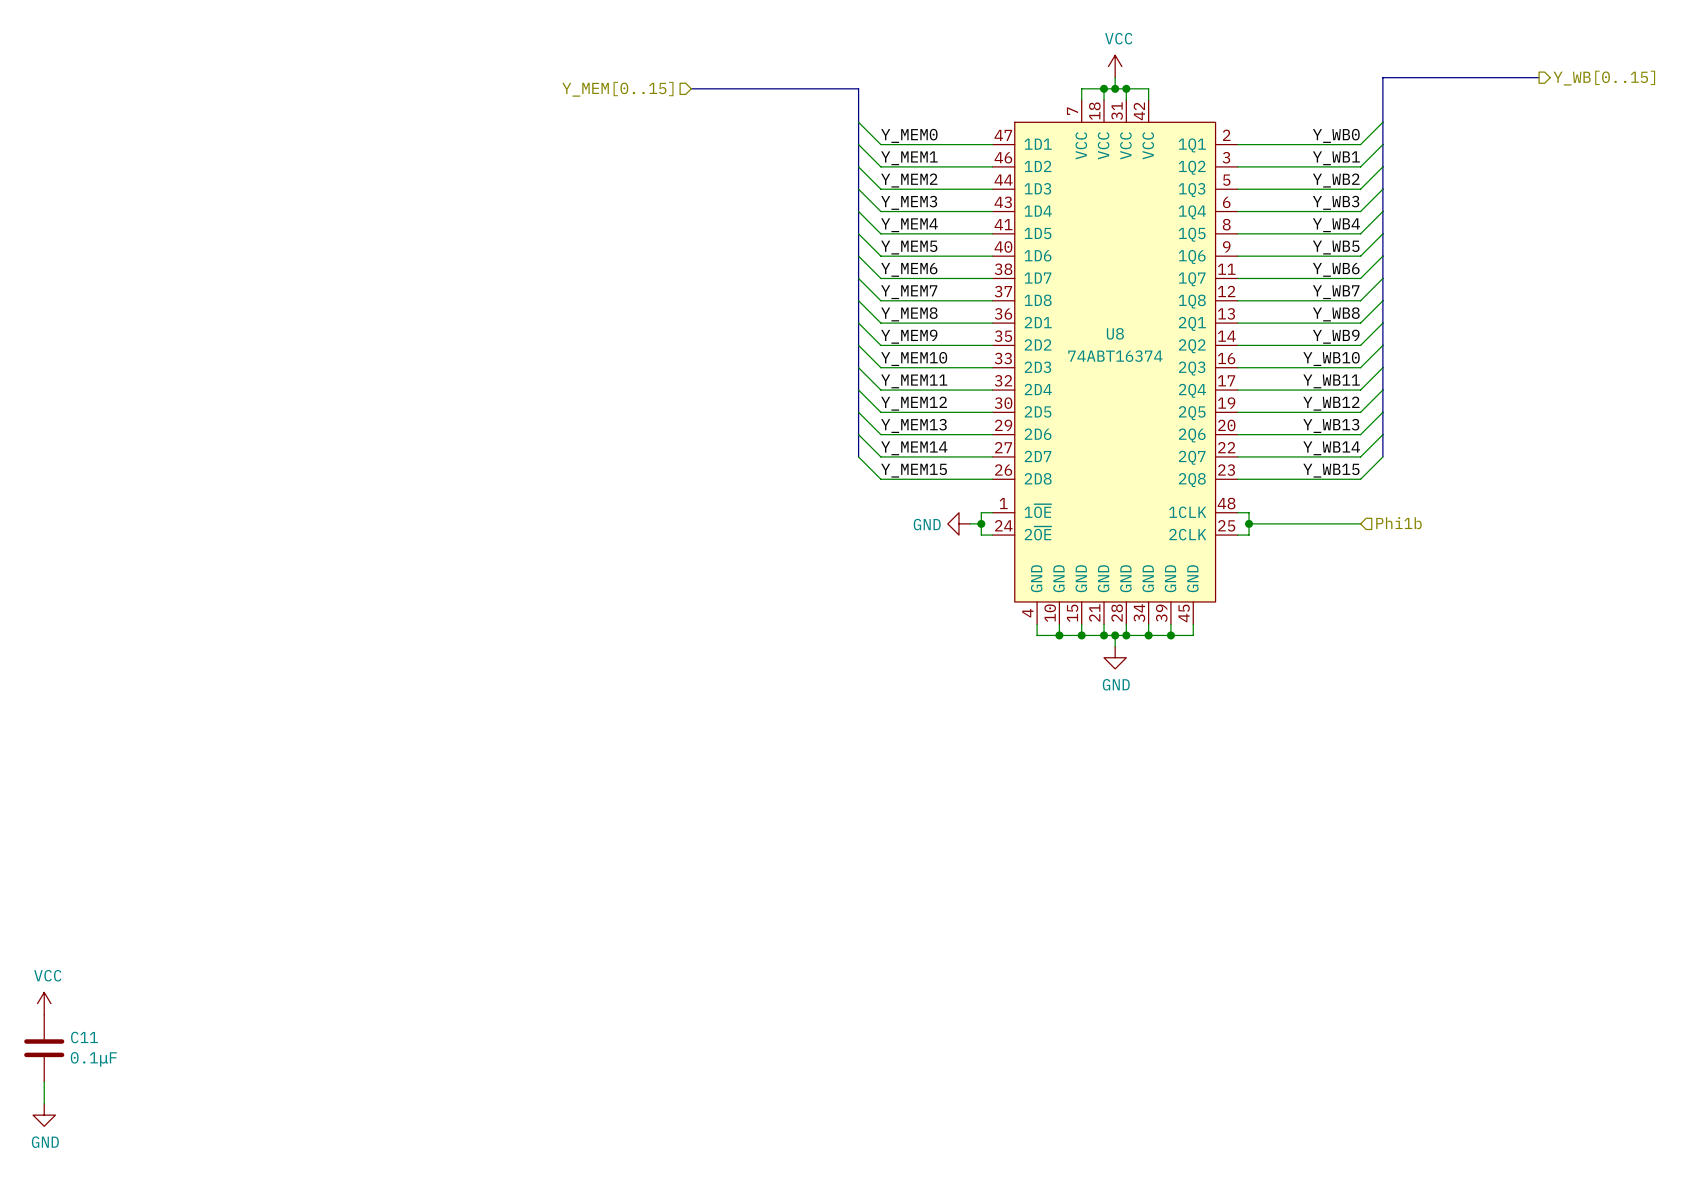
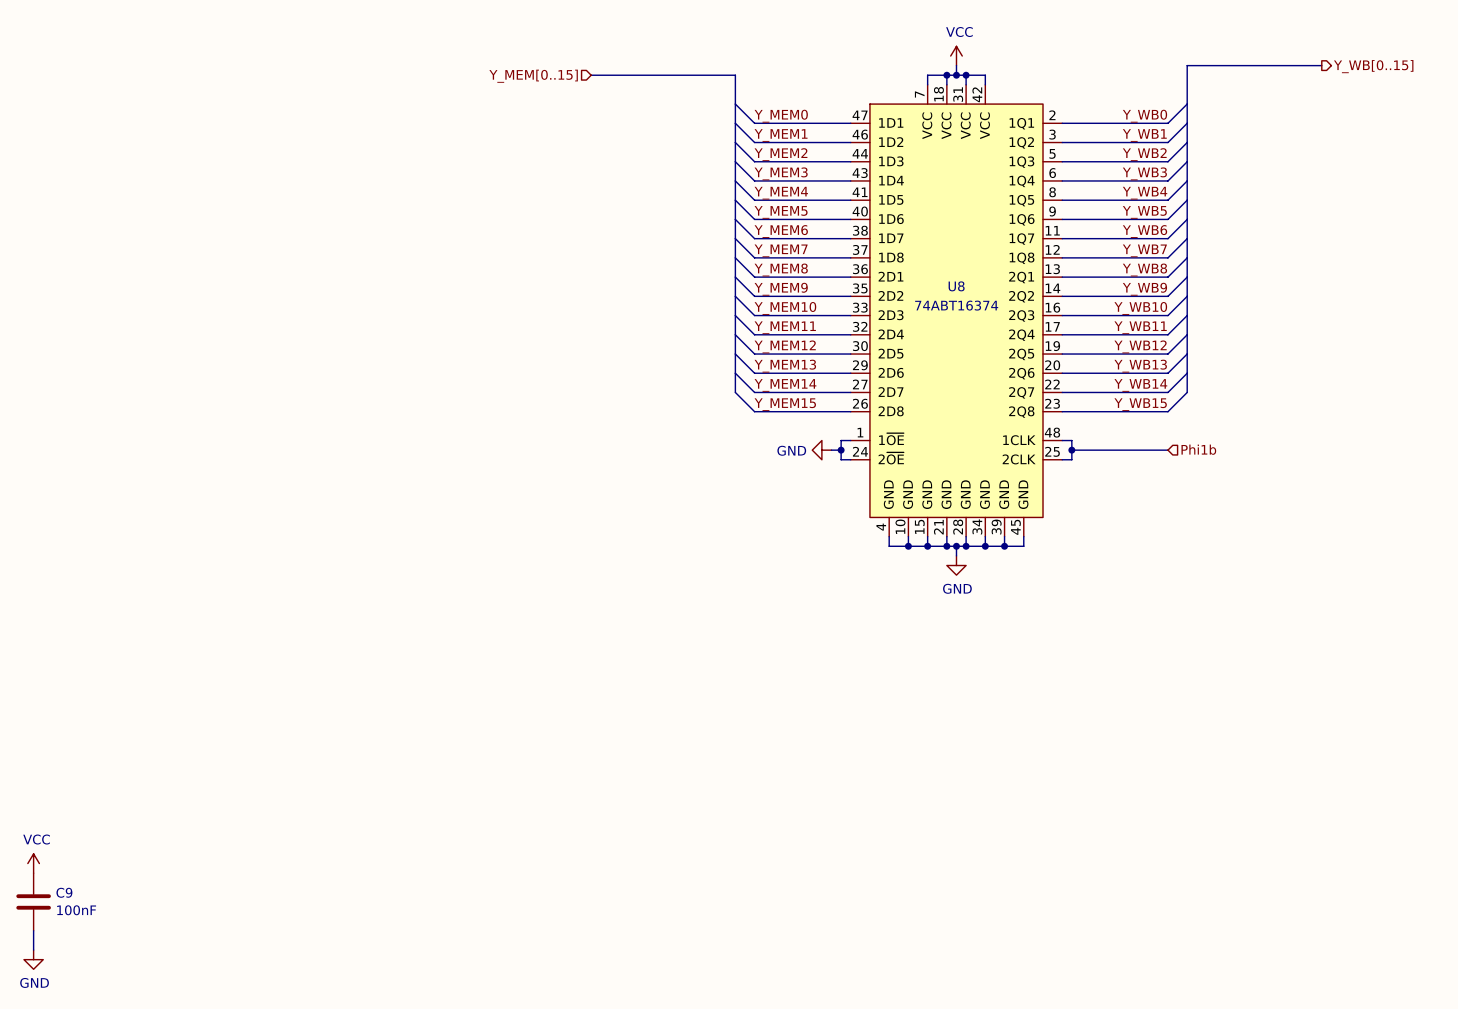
C11 name: C11 (84, 1037) -> C9 (64, 892)
C11 value: 0.1μF (93, 1059) -> 100nF (76, 910)

